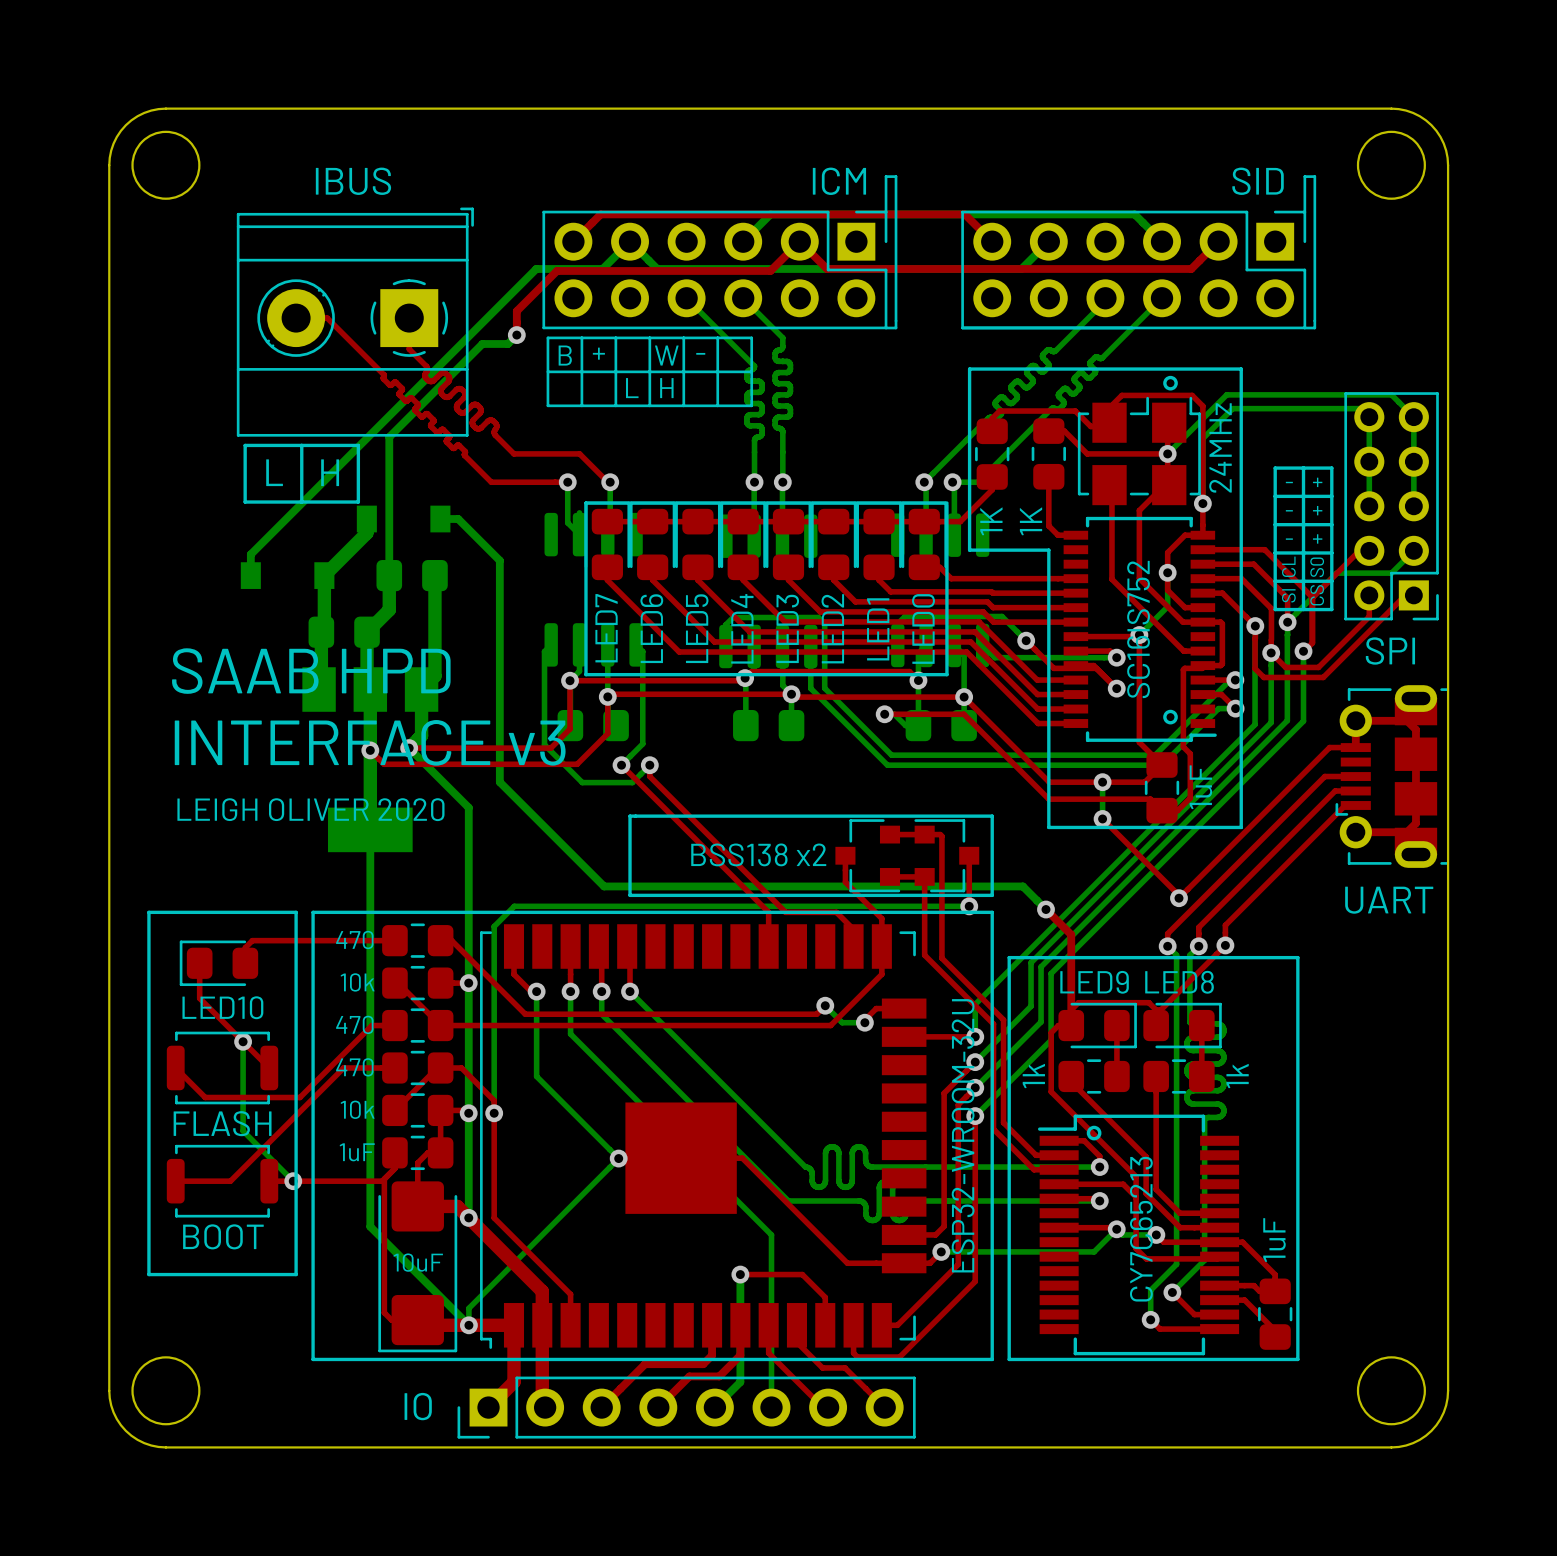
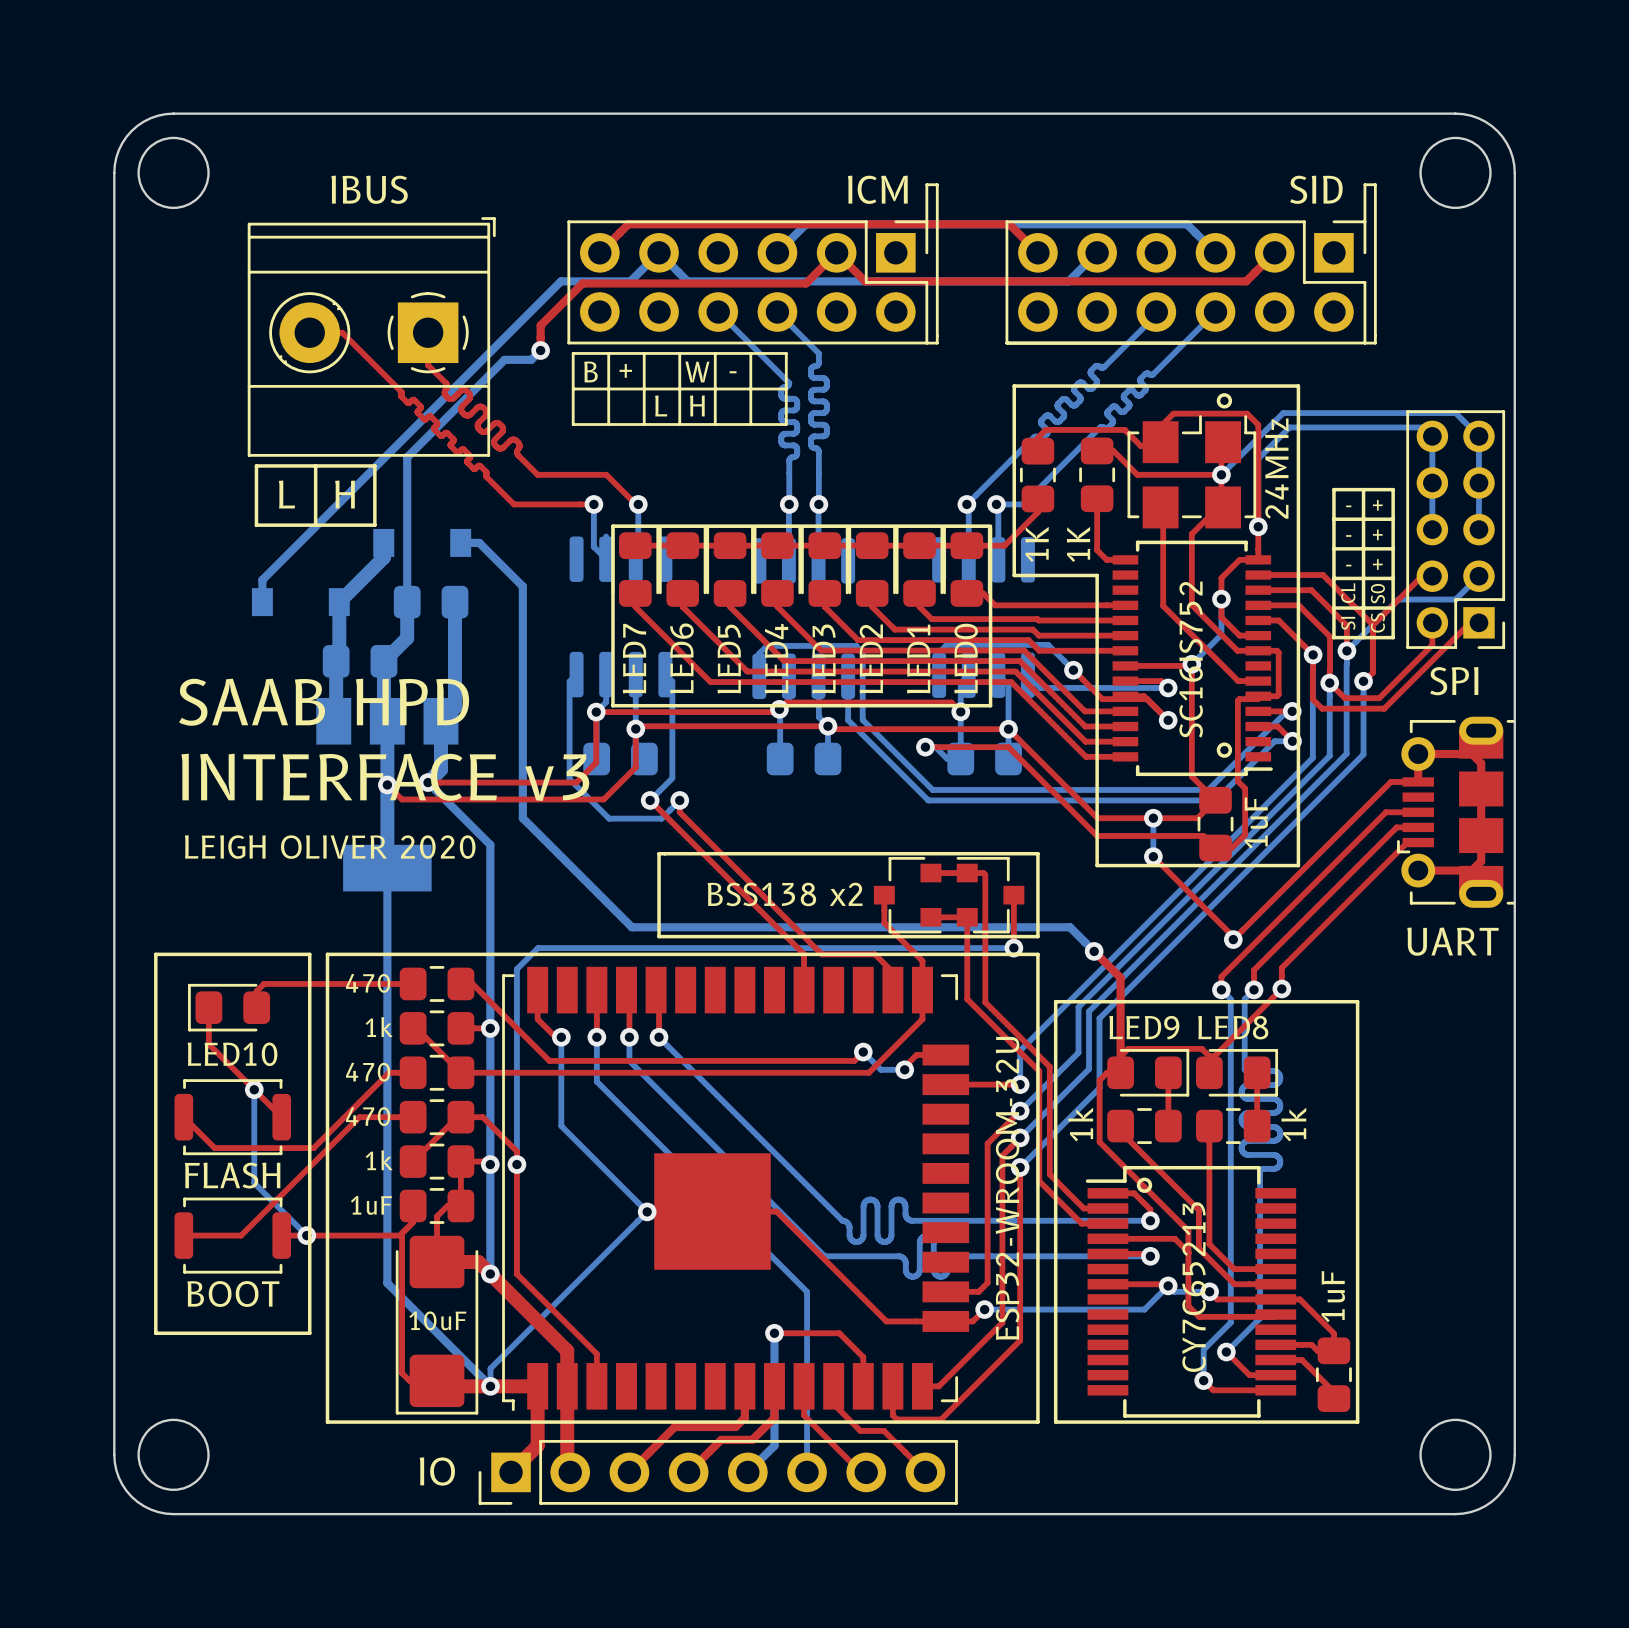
part value: 10k (357, 982) -> 1k (379, 1027)
part value: 10k (357, 1109) -> 1k (379, 1160)

